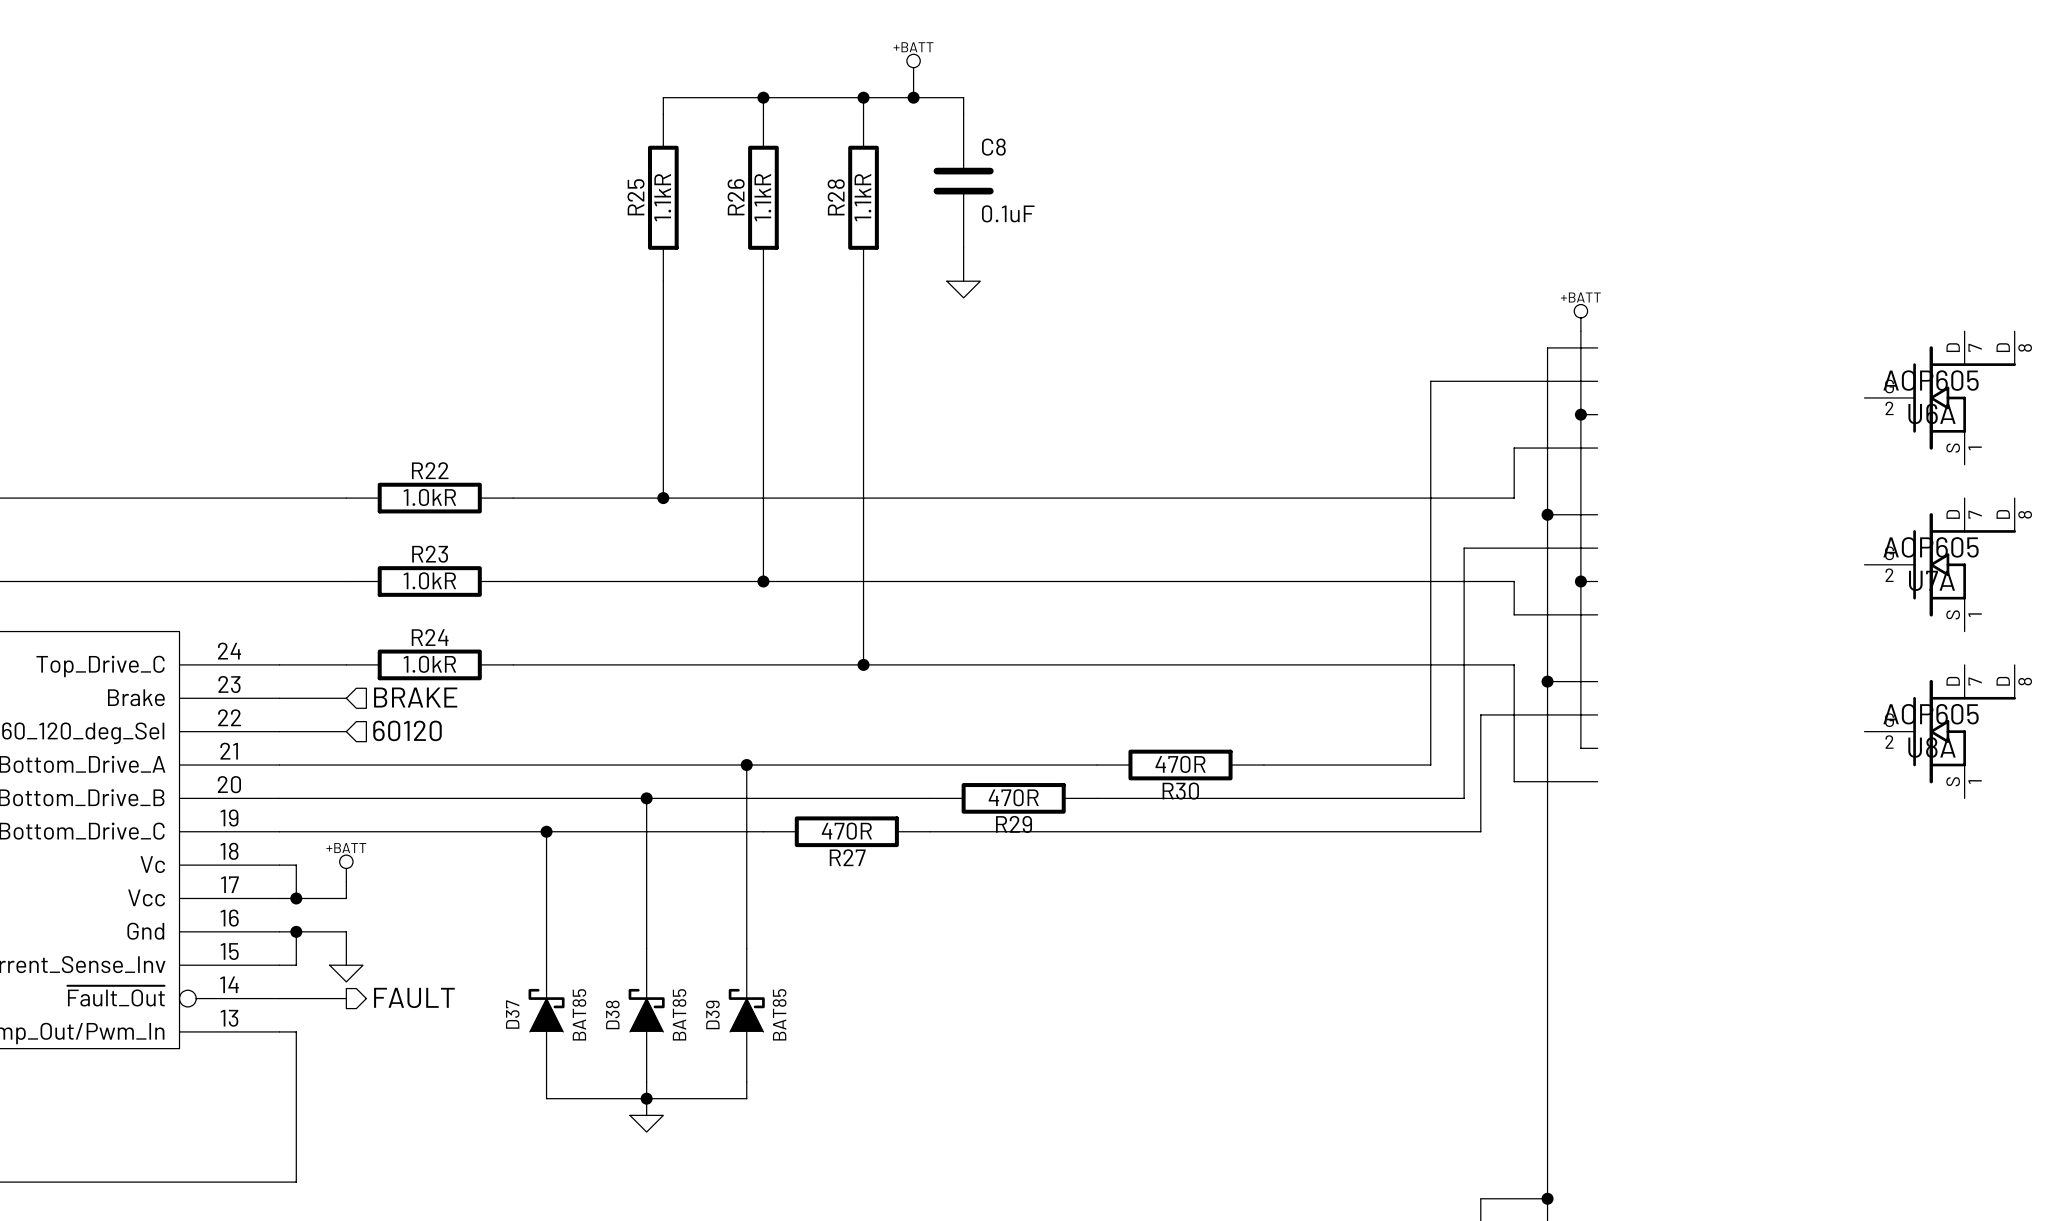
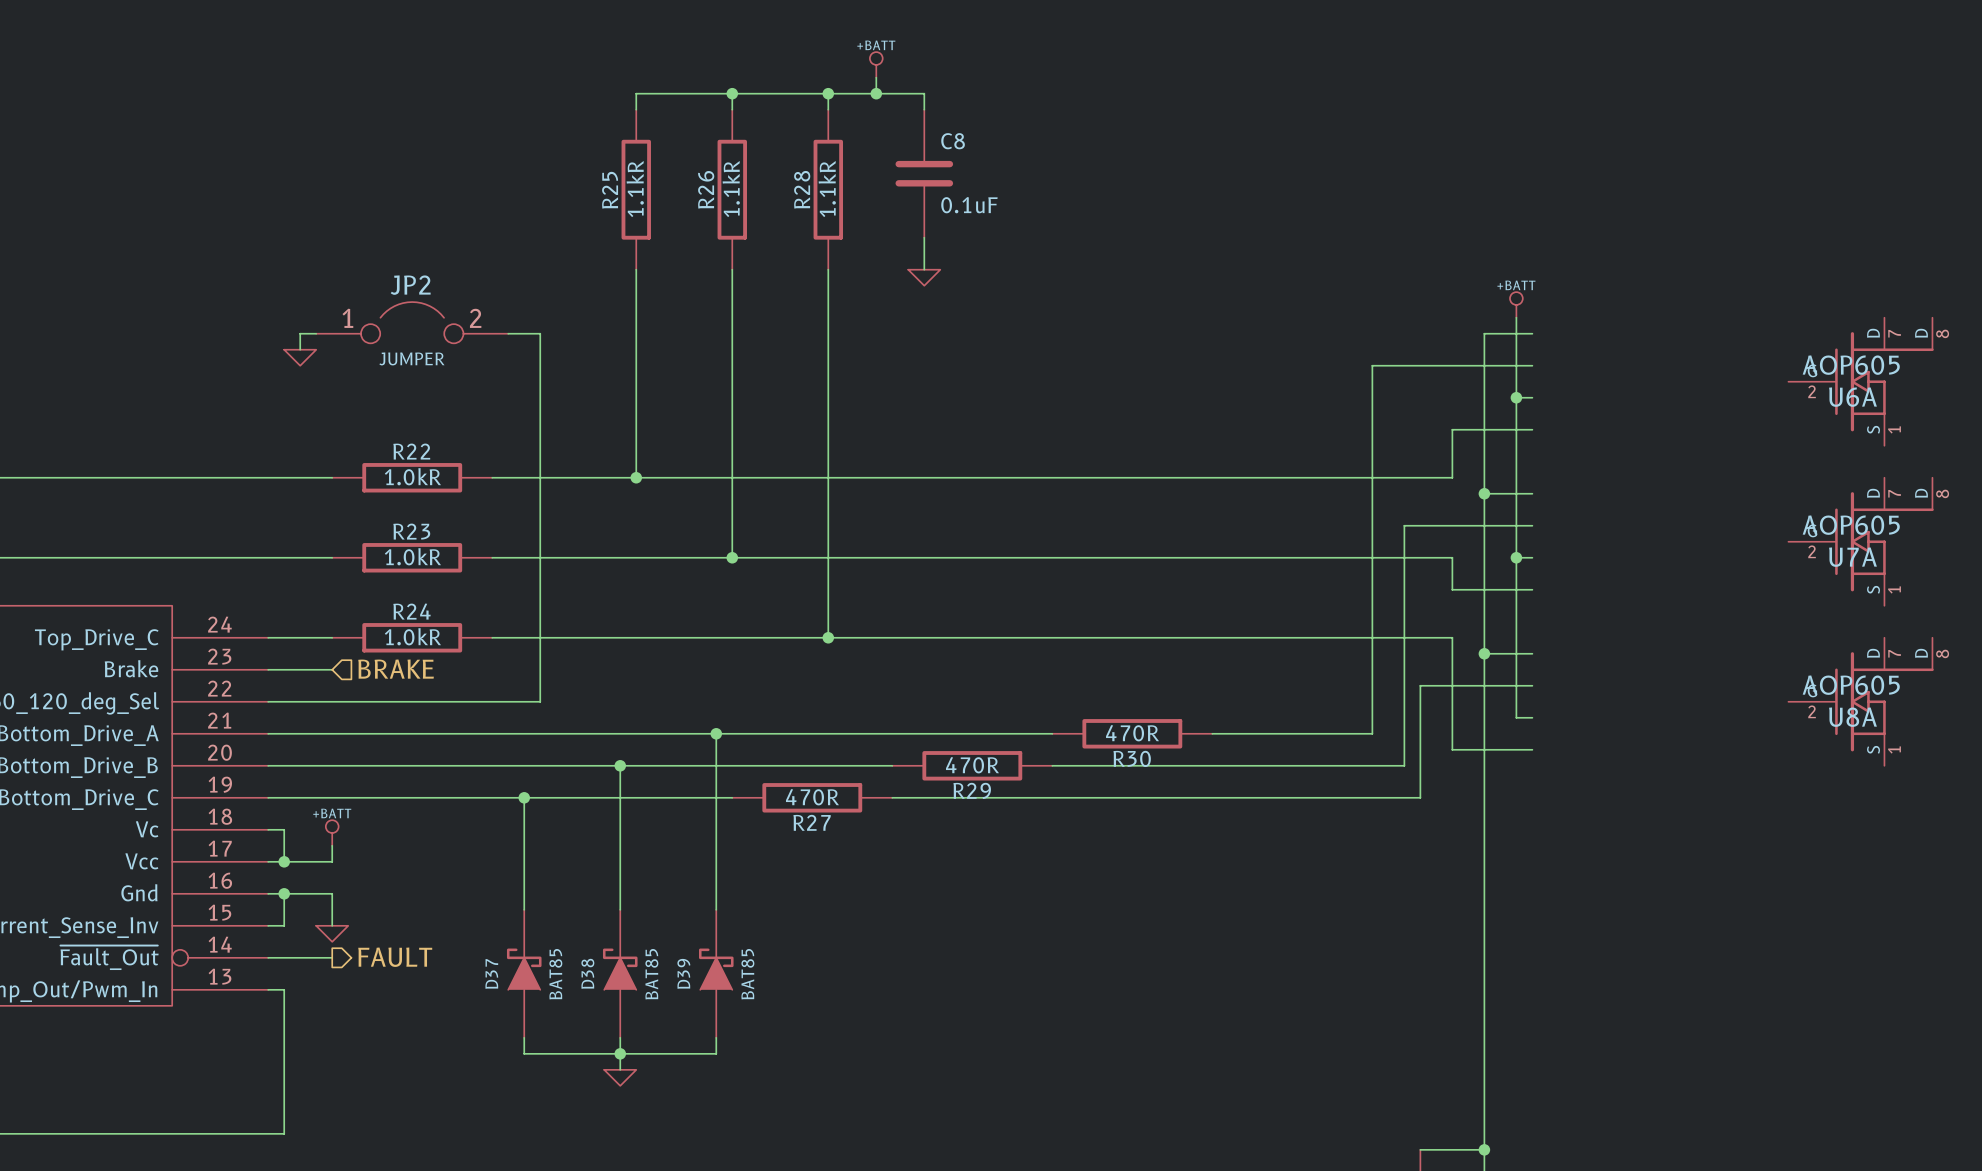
JP2: none -> JUMPER (412, 322)
wire: none -> (316, 333) (300, 333) (300, 349)
wire: none -> (508, 333) (540, 333) (540, 701) (332, 701)
power symbol: none -> (300, 357)
hierarchical label: 60120 (407, 730) -> none

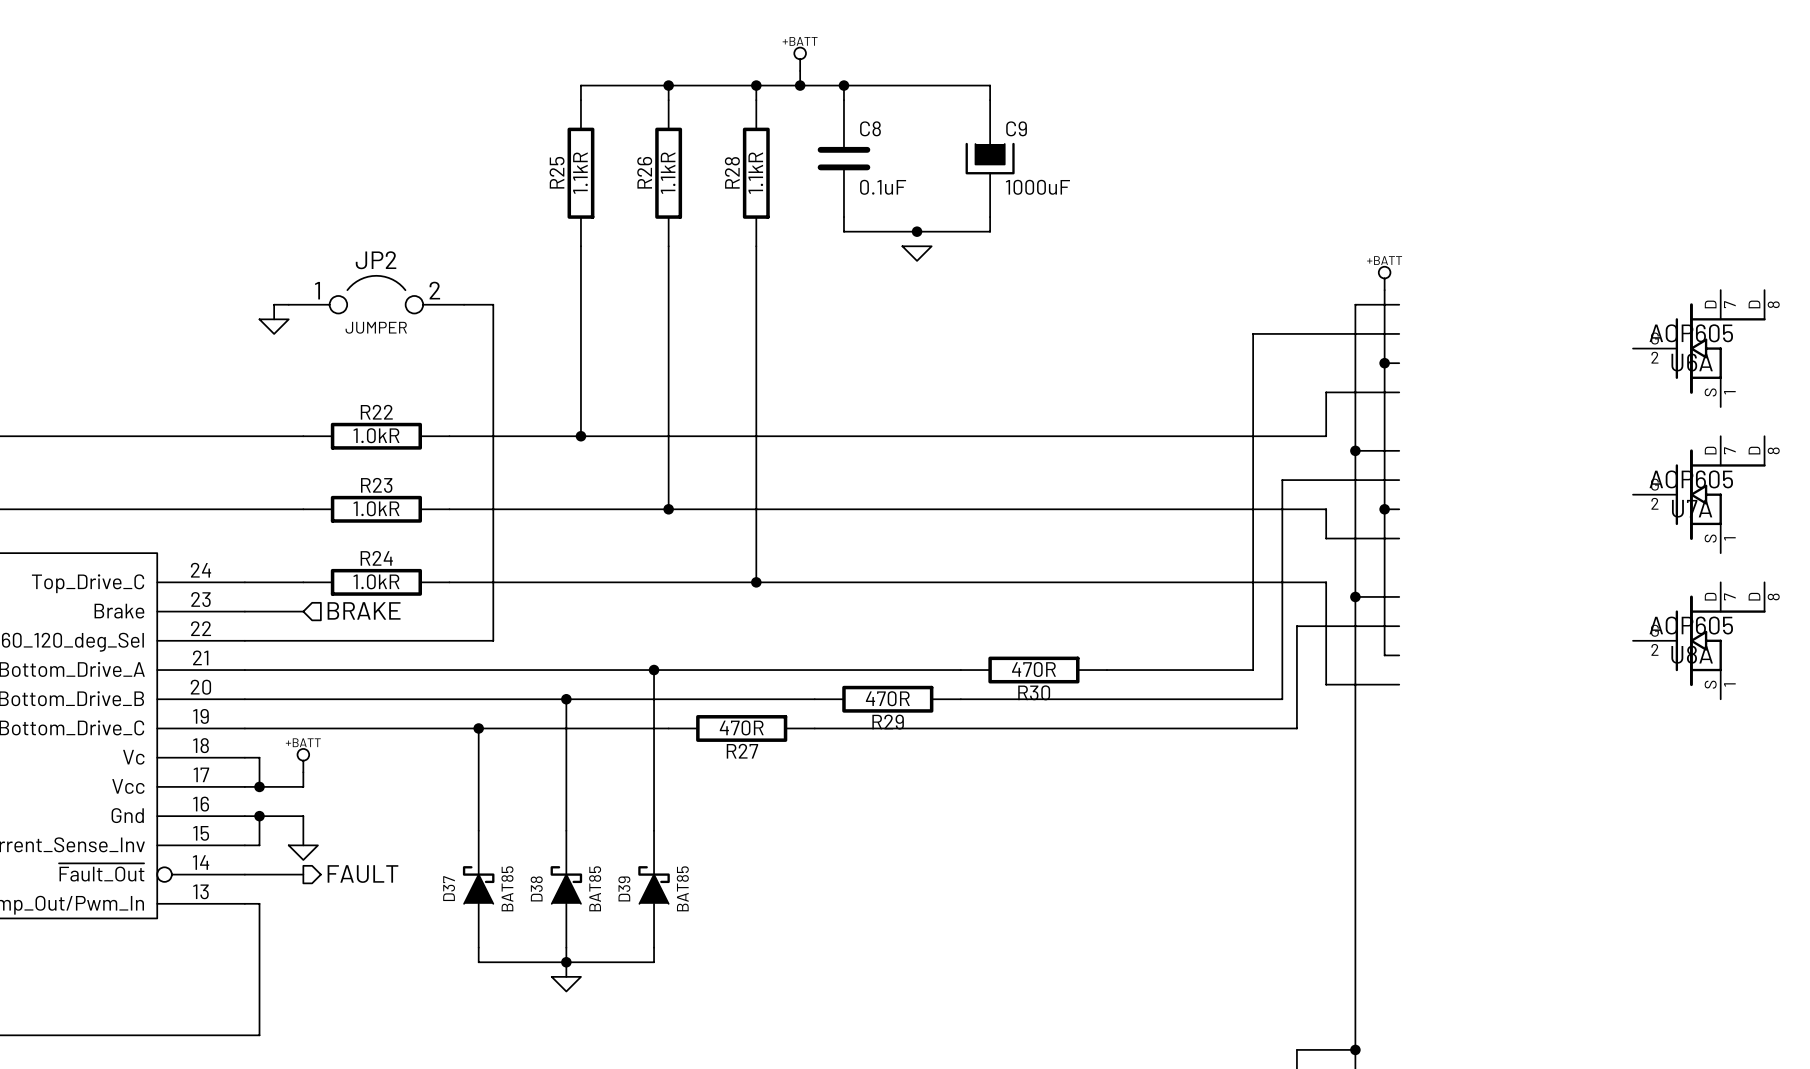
wire: none -> (843, 85) (990, 85) (990, 100)
junction: none -> (843, 85)
C9: none -> 1000uF (990, 158)
wire: (924, 253) (924, 269) -> (843, 231) (990, 231) (990, 217)
junction: none -> (917, 231)
power symbol position: (924, 277) -> (917, 253)

